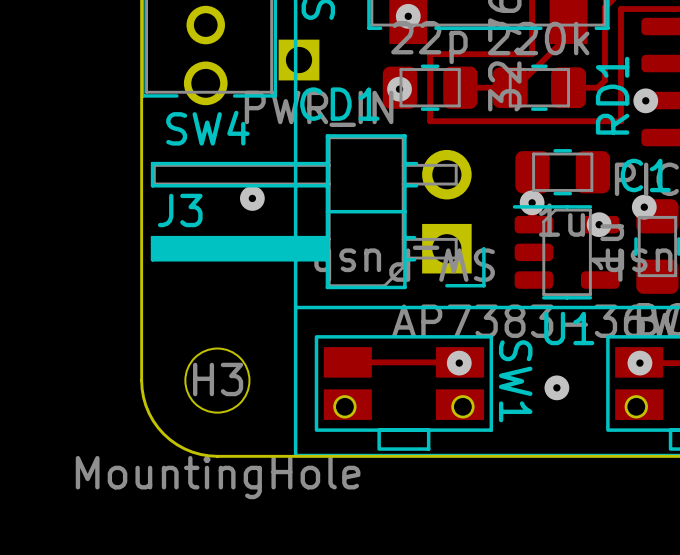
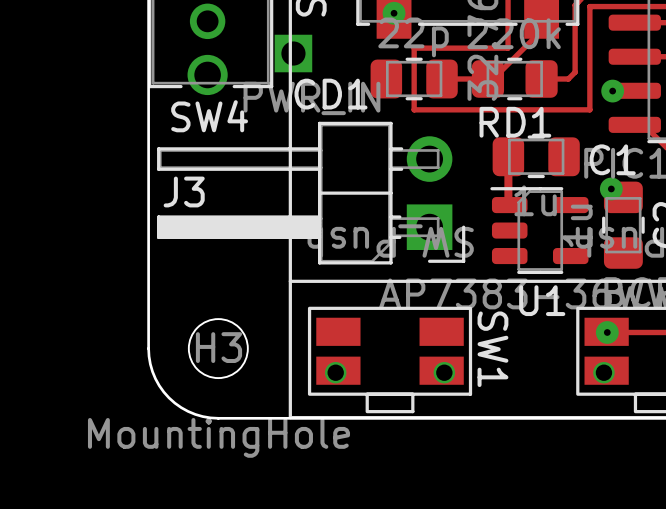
via: (399, 89) -> none
RD1 name rotation: 0° (612, 95) -> 90° clockwise (515, 122)
via: (252, 198) -> none
via: (532, 202) -> none
via: (599, 224) -> none
track: (347, 362) (459, 363) -> none
via: (459, 363) -> none
via: (556, 387) -> none

